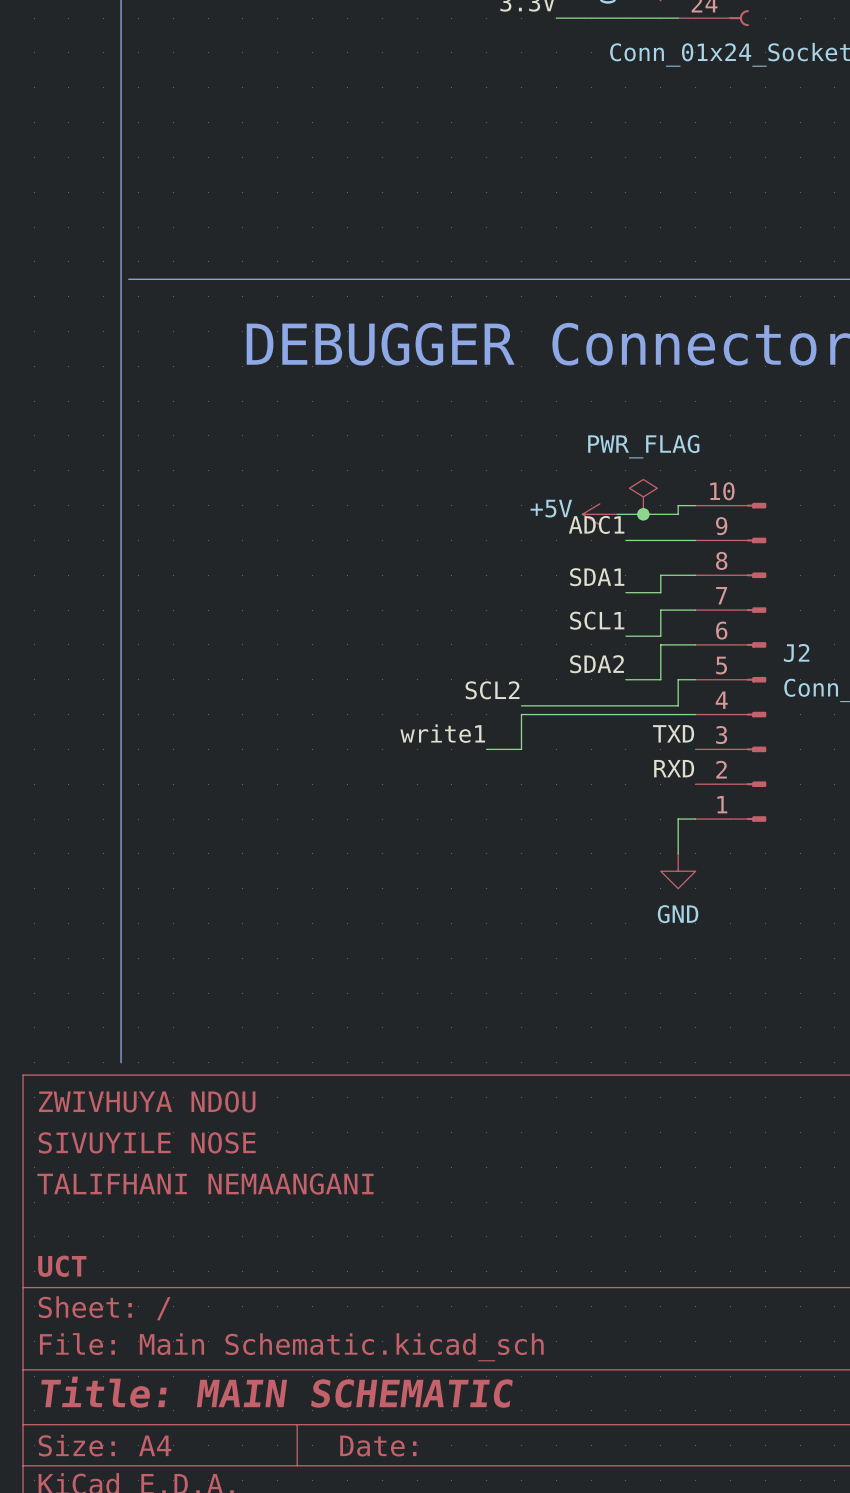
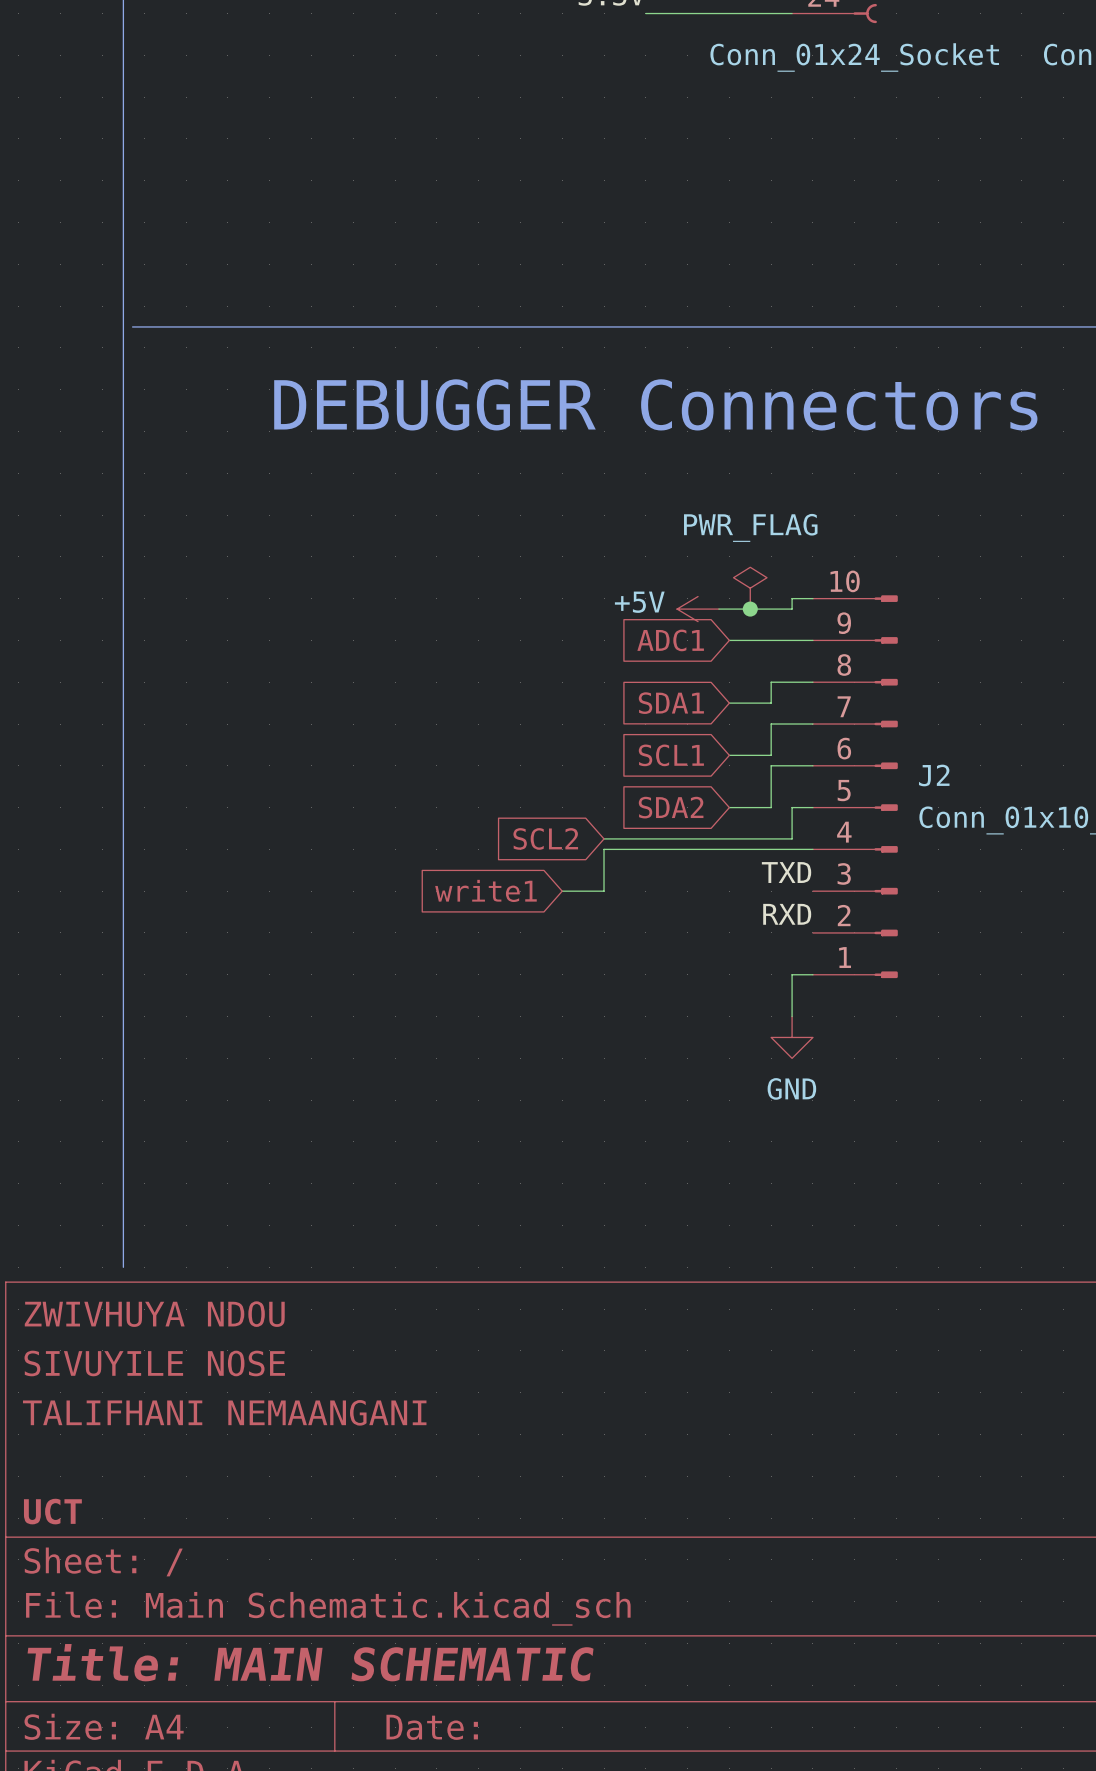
label: ADC1 (596, 524) -> none
global label: none -> ADC1 (670, 640)
label: SDA1 (597, 577) -> none
global label: none -> SDA1 (671, 703)
label: SCL1 (597, 620) -> none
global label: none -> SCL1 (671, 755)
label: SDA2 (597, 664) -> none
global label: none -> SDA2 (671, 807)
label: SCL2 (492, 690) -> none
global label: none -> SCL2 (545, 838)
label: write1 (442, 733) -> none
global label: none -> write1 (485, 890)

